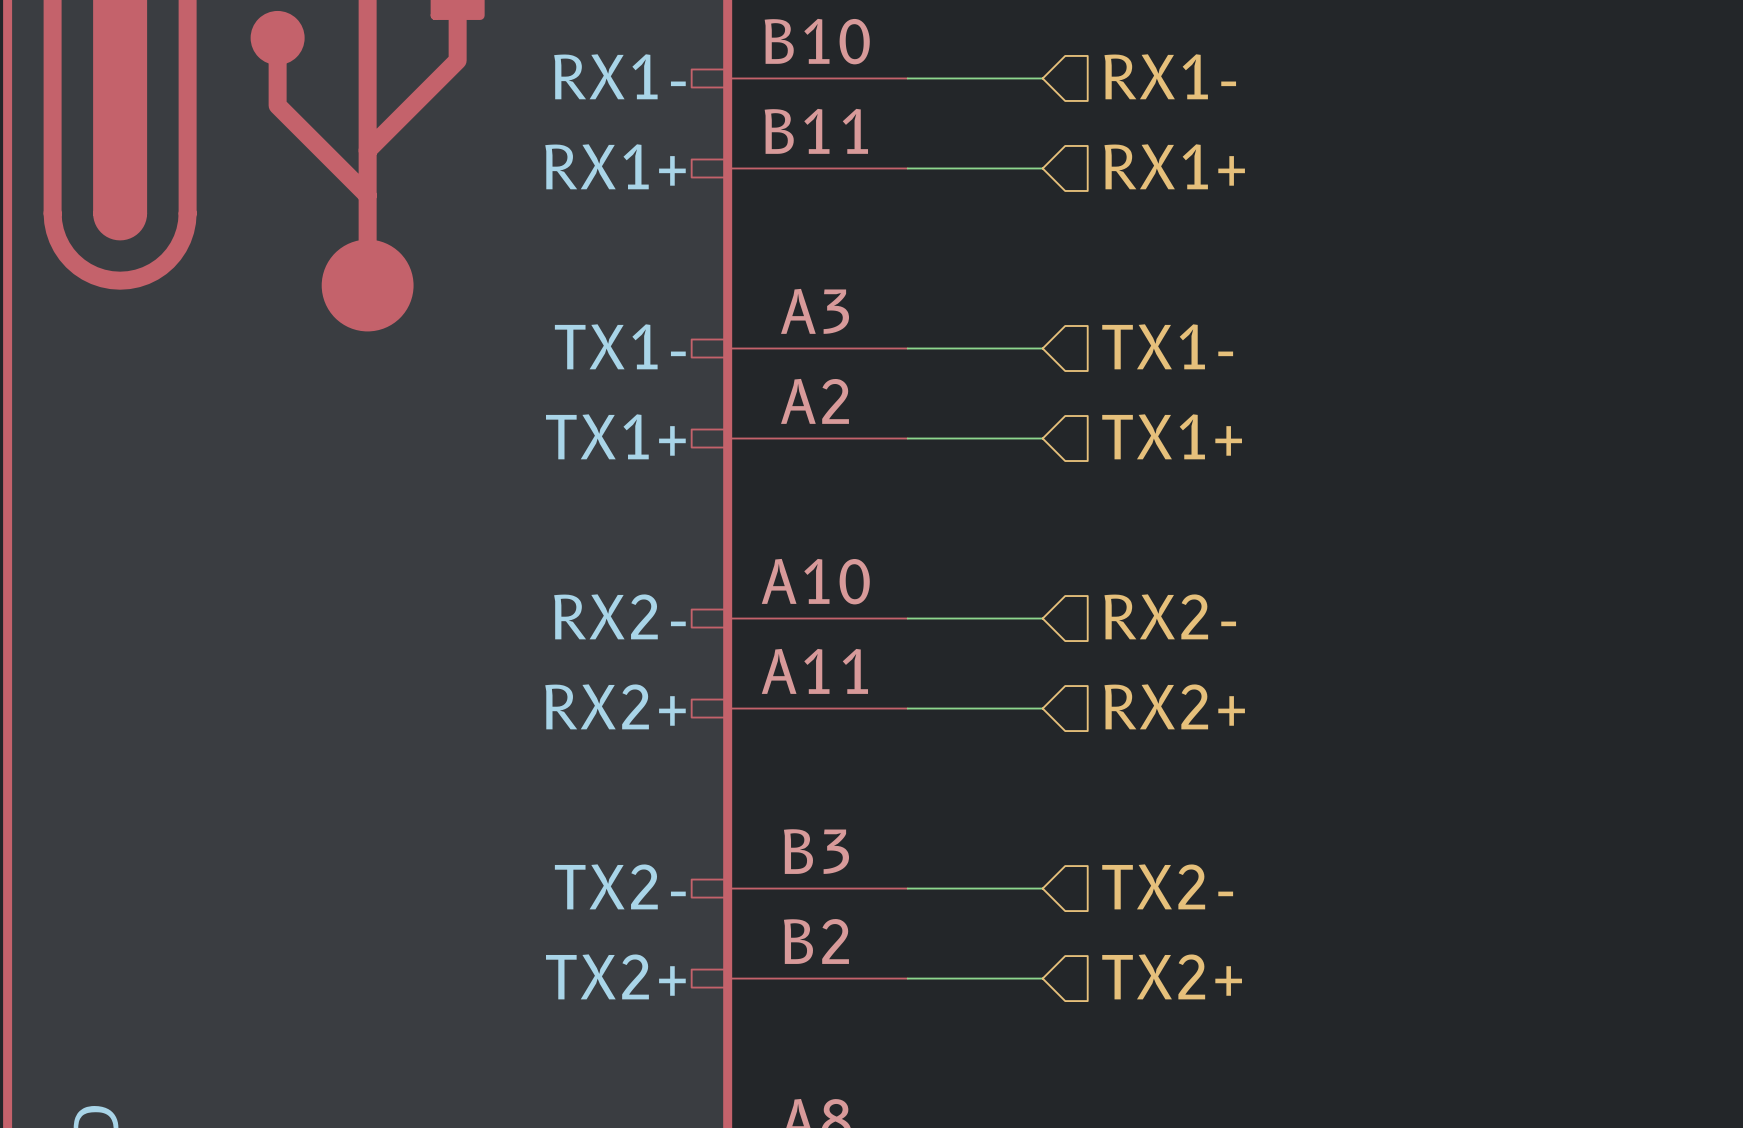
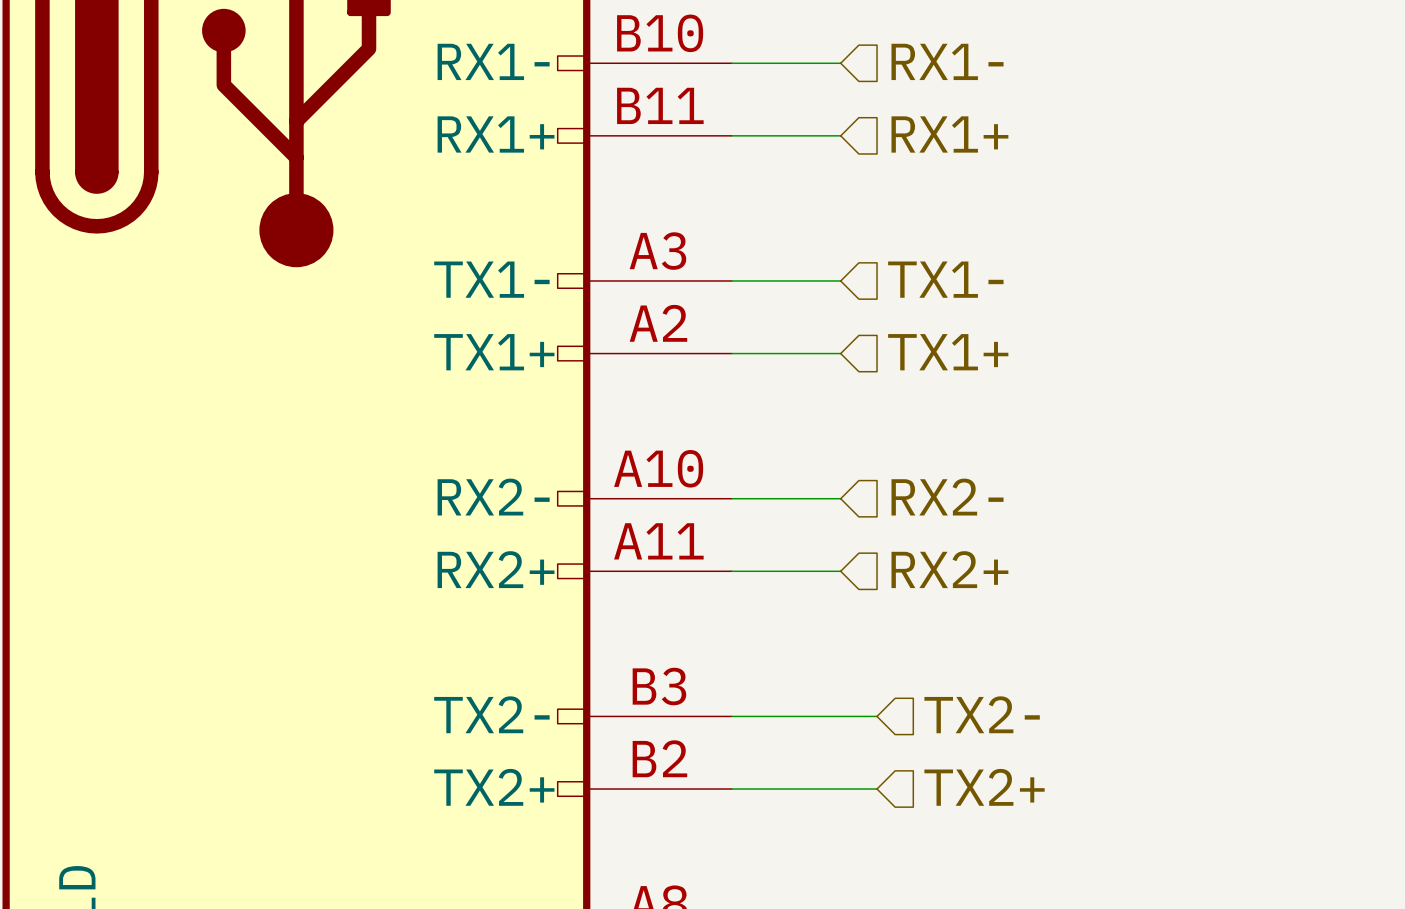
hierarchical label position: TX2- (1167, 886) -> TX2- (982, 714)
wire: none -> (840, 716) (877, 716)
hierarchical label position: TX2+ (1172, 976) -> TX2+ (984, 787)
wire: none -> (840, 789) (877, 789)

